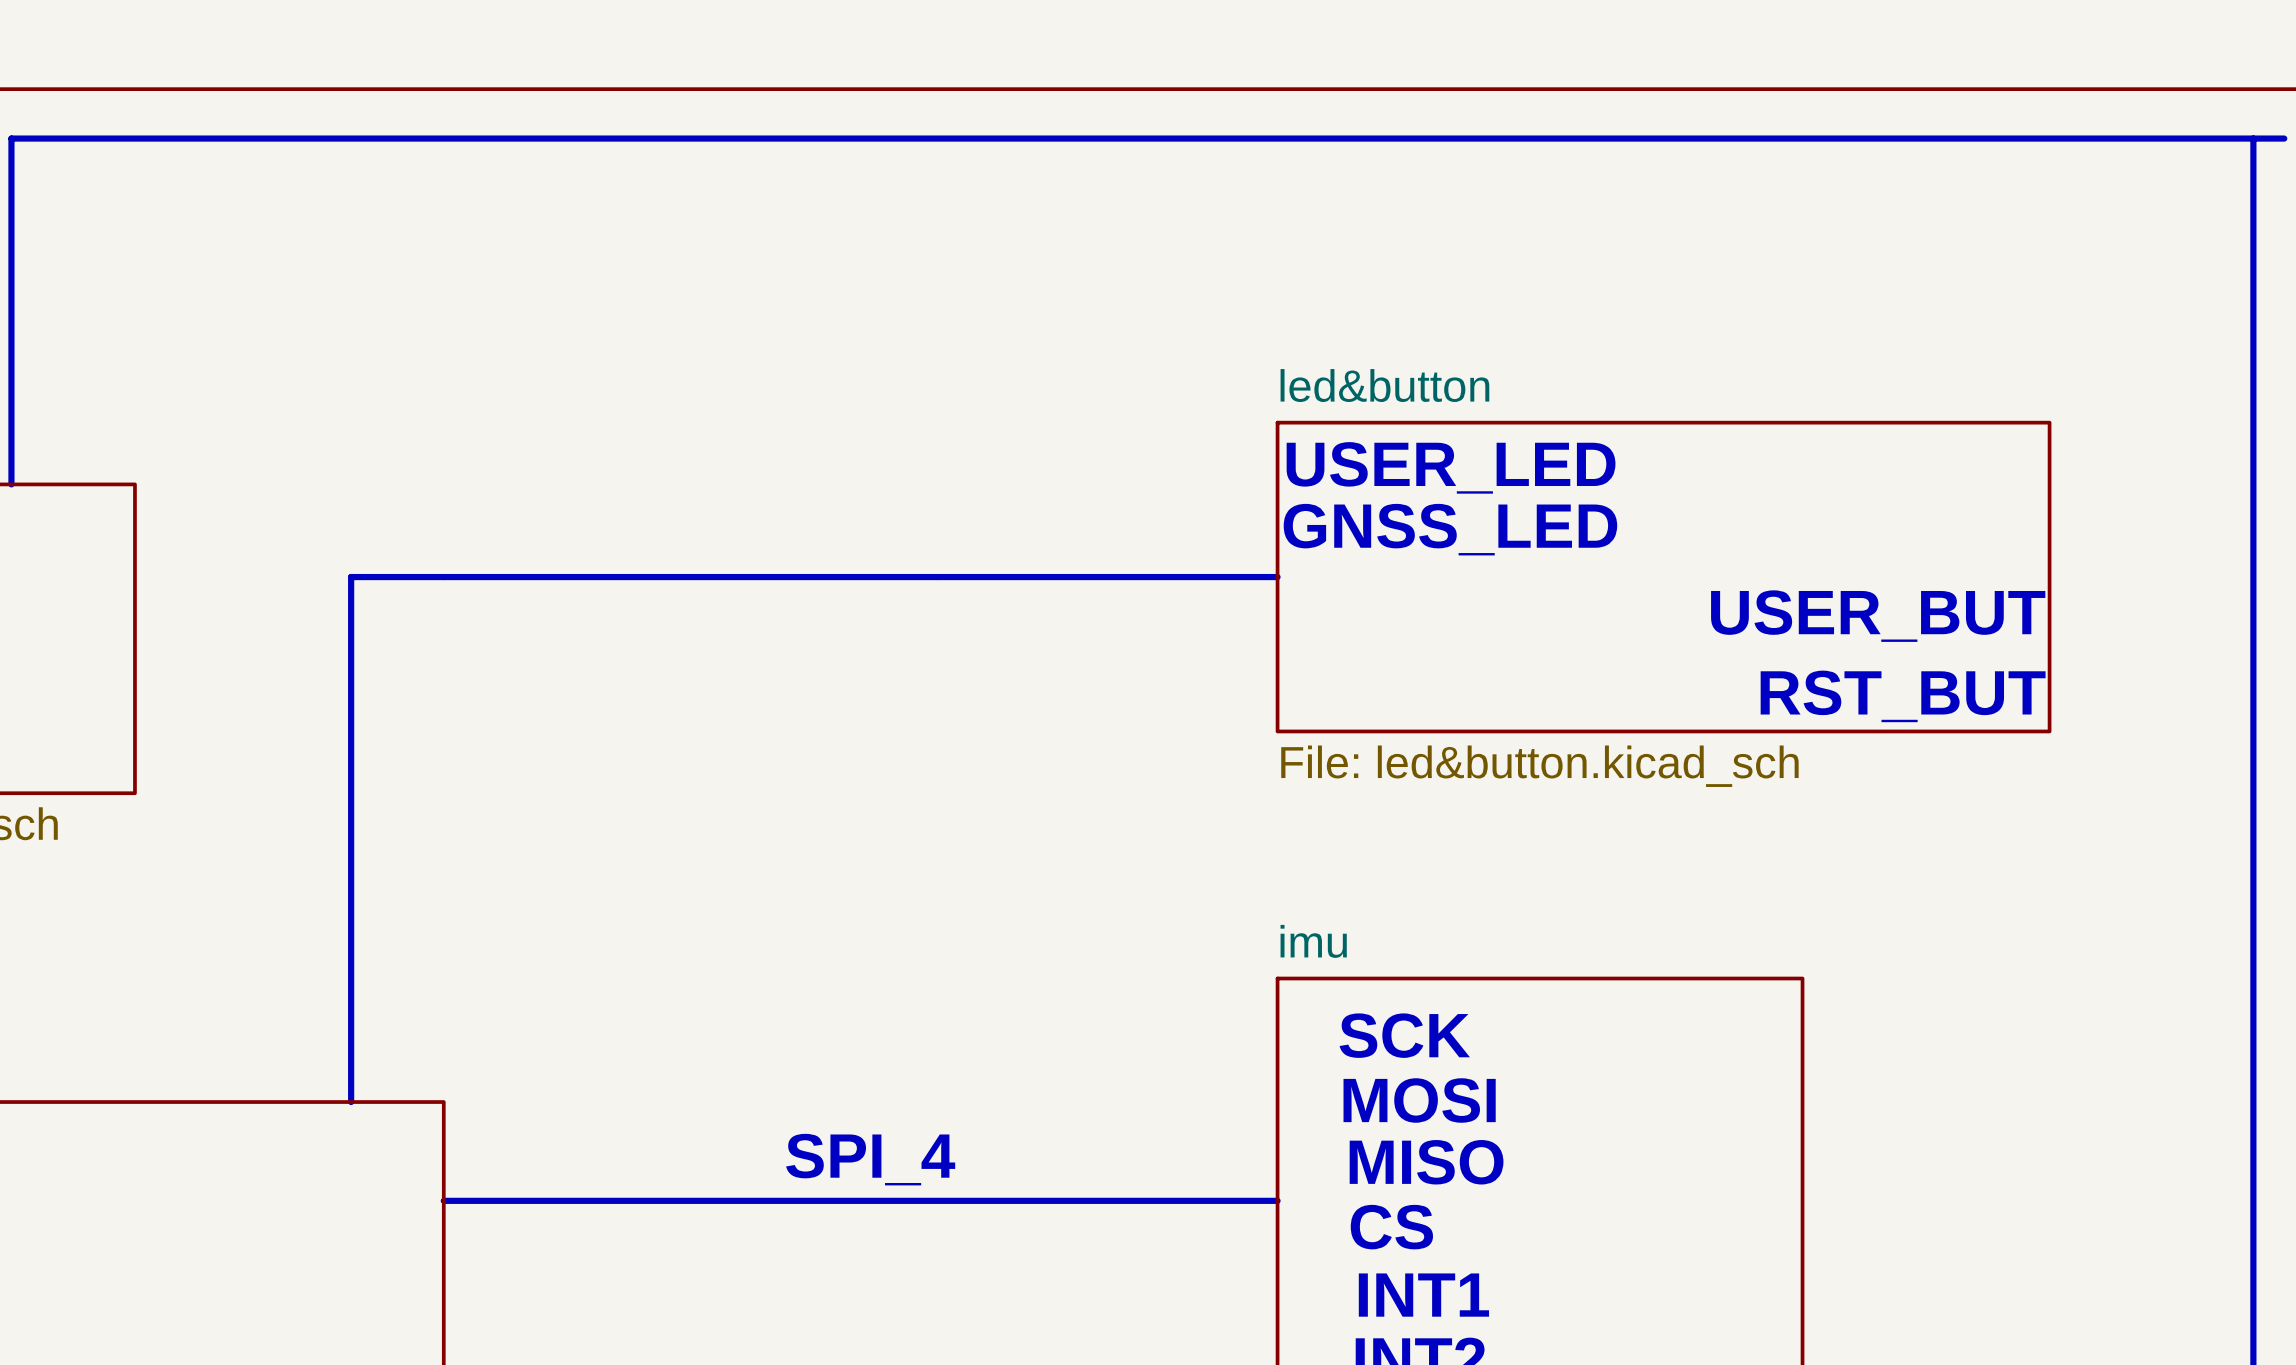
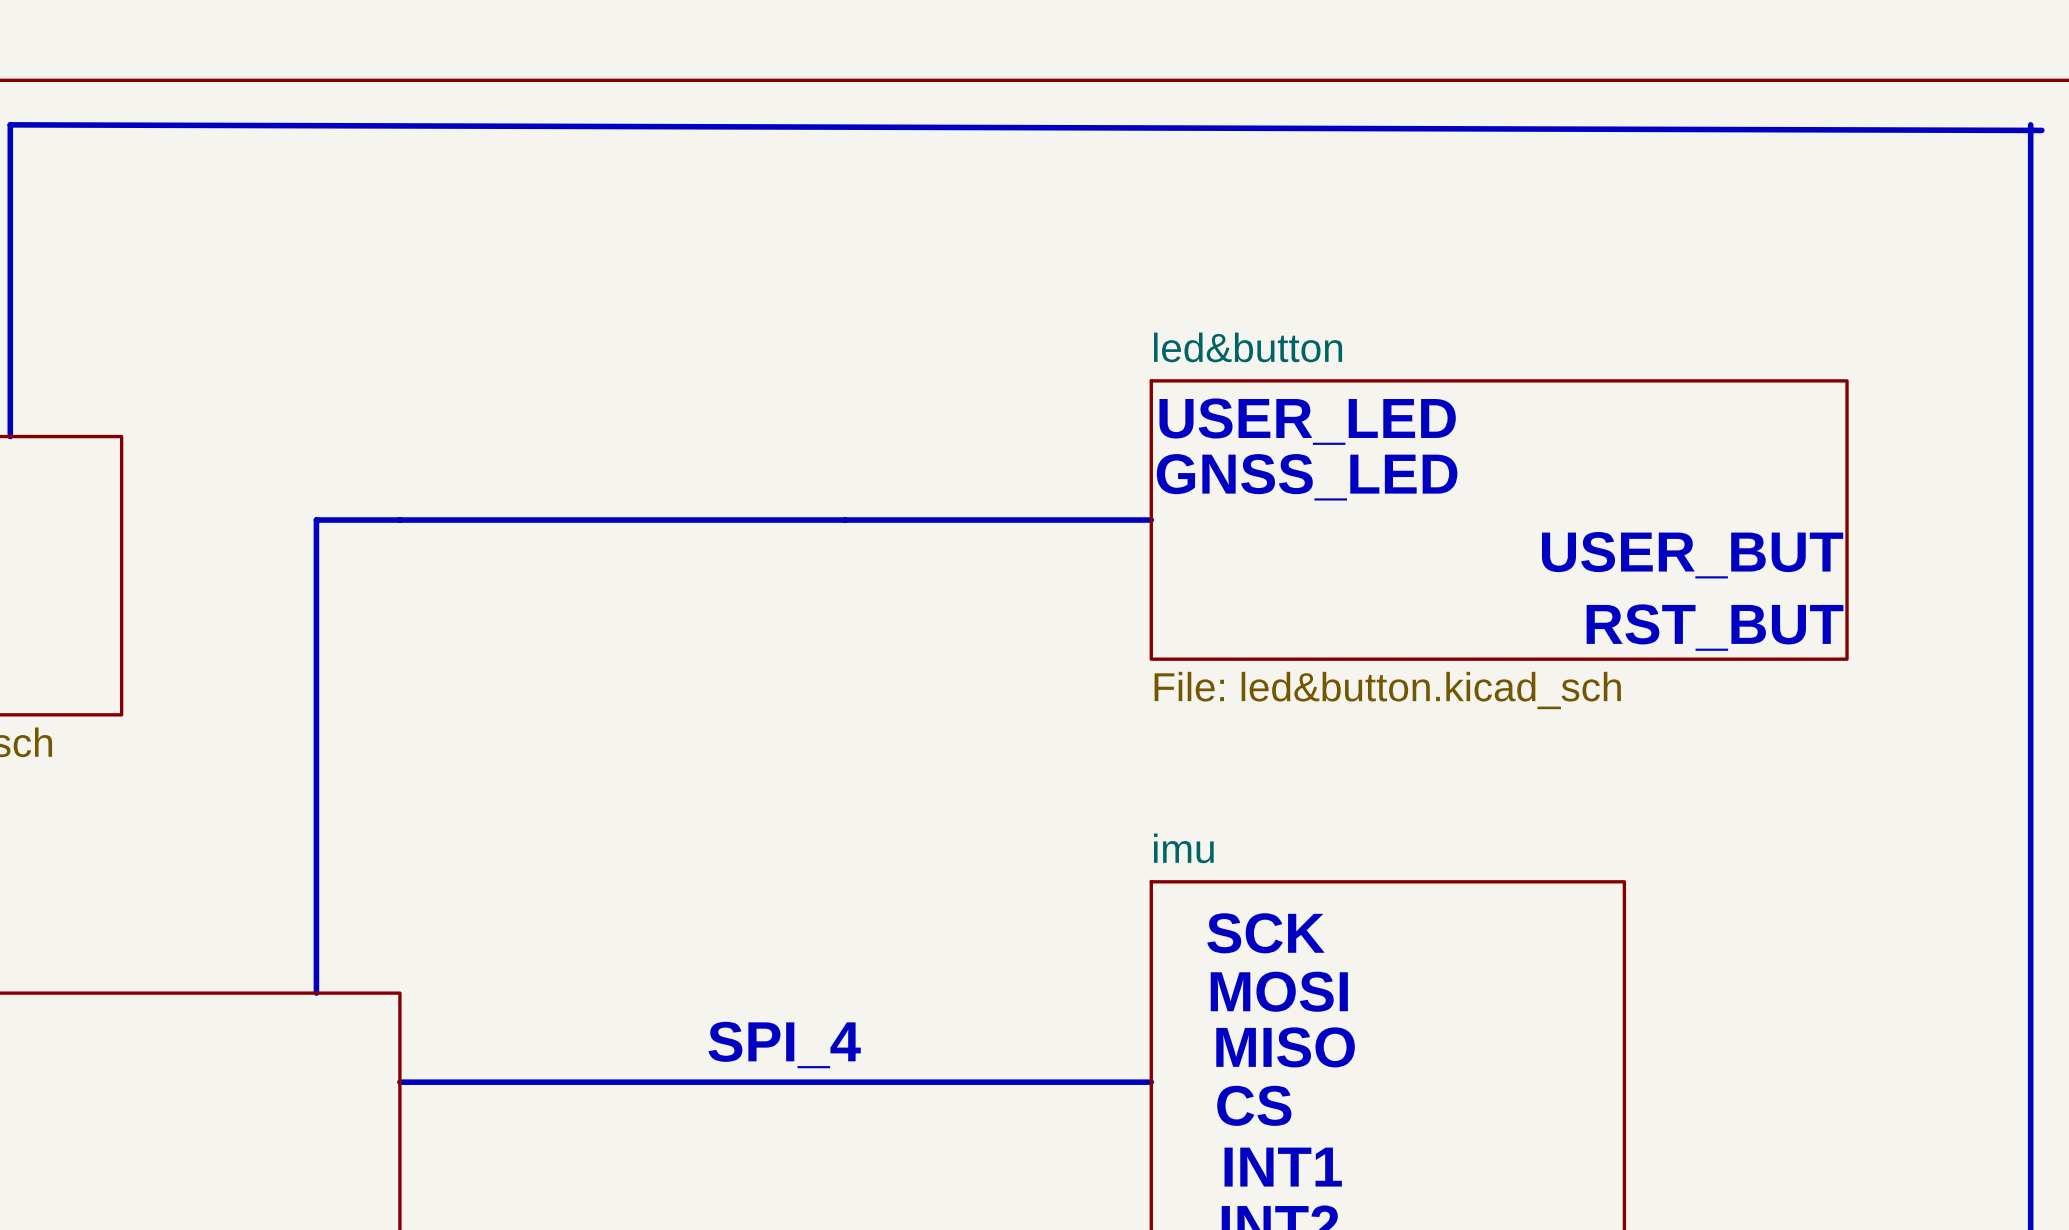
line: (11, 138) (2284, 138) -> (10, 124) (2041, 130)

